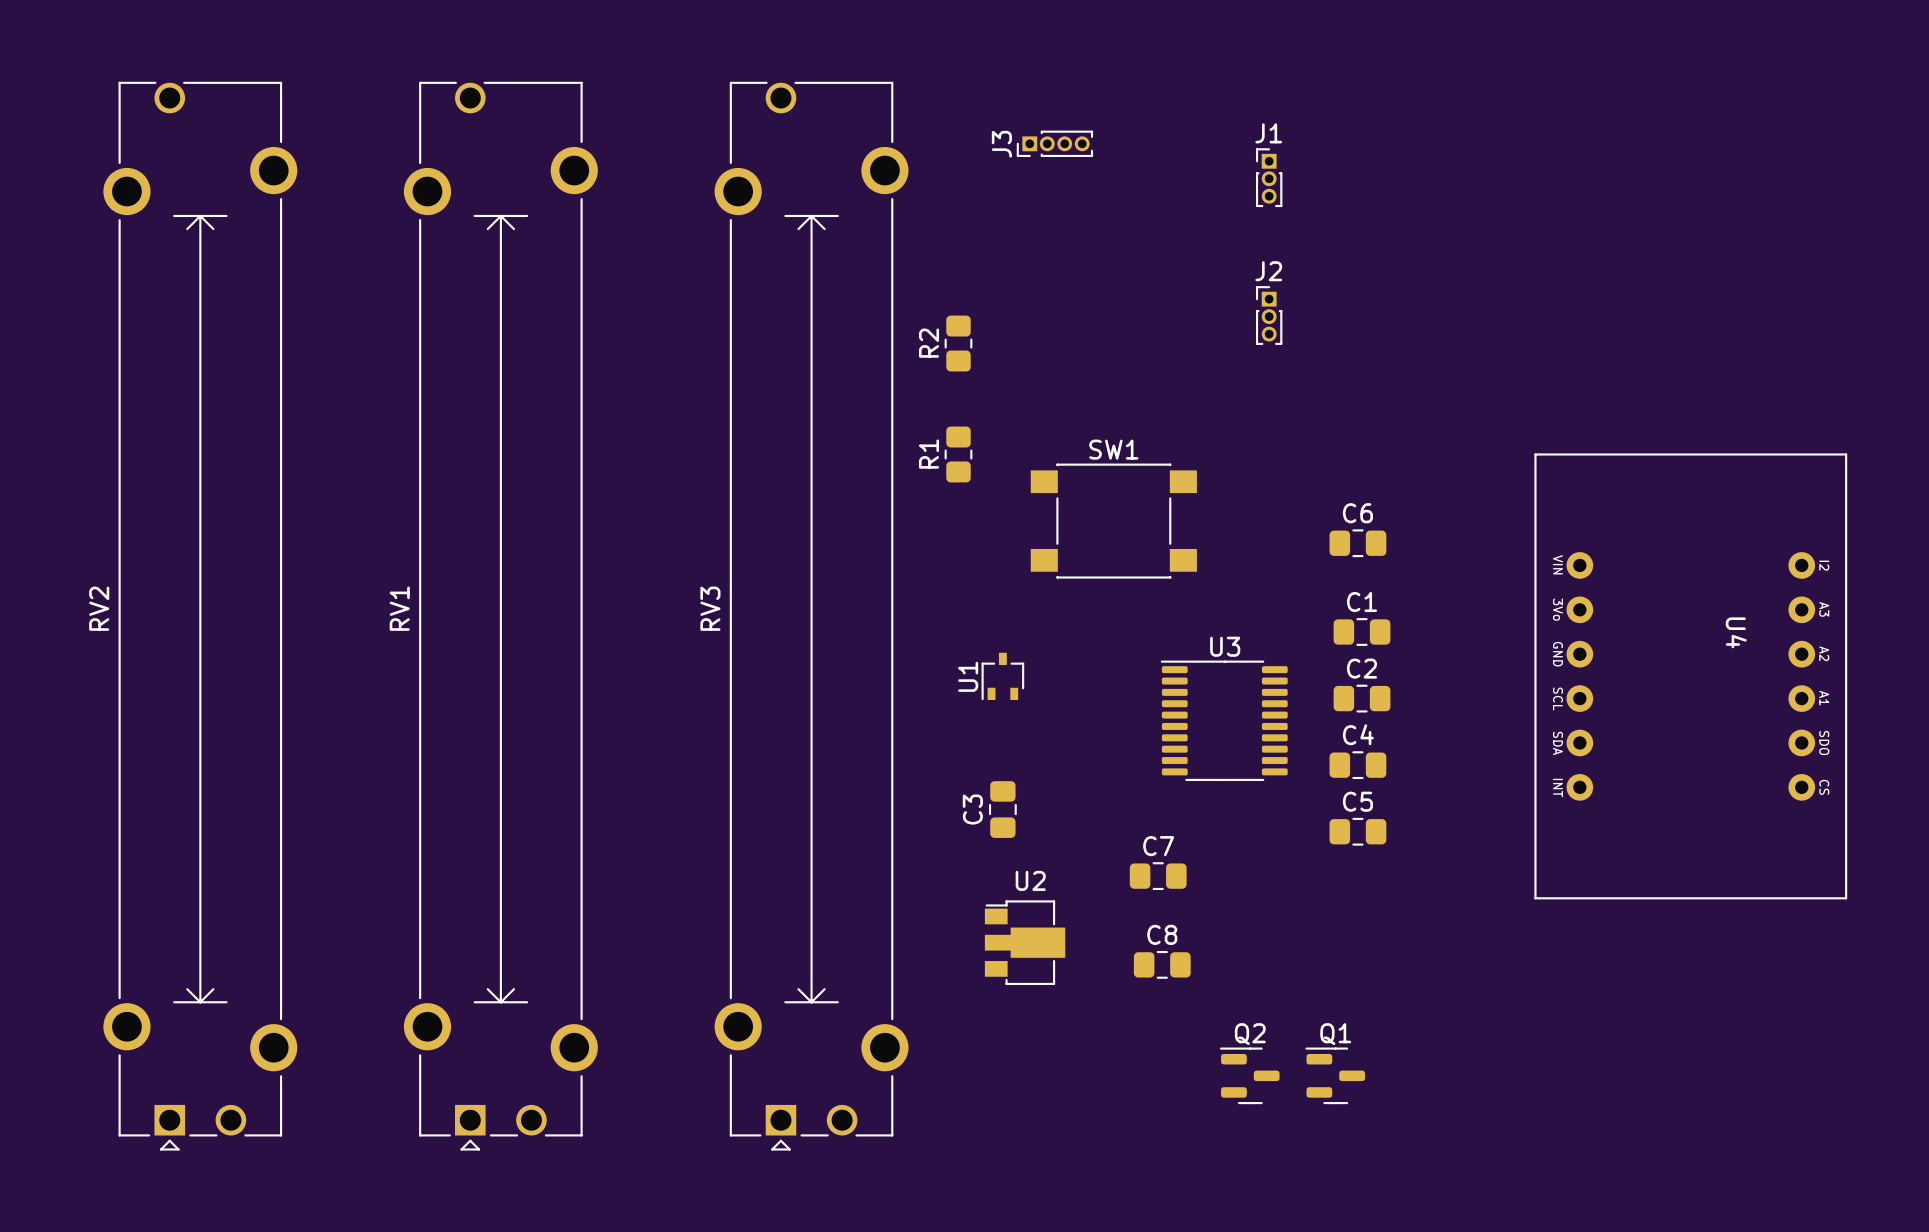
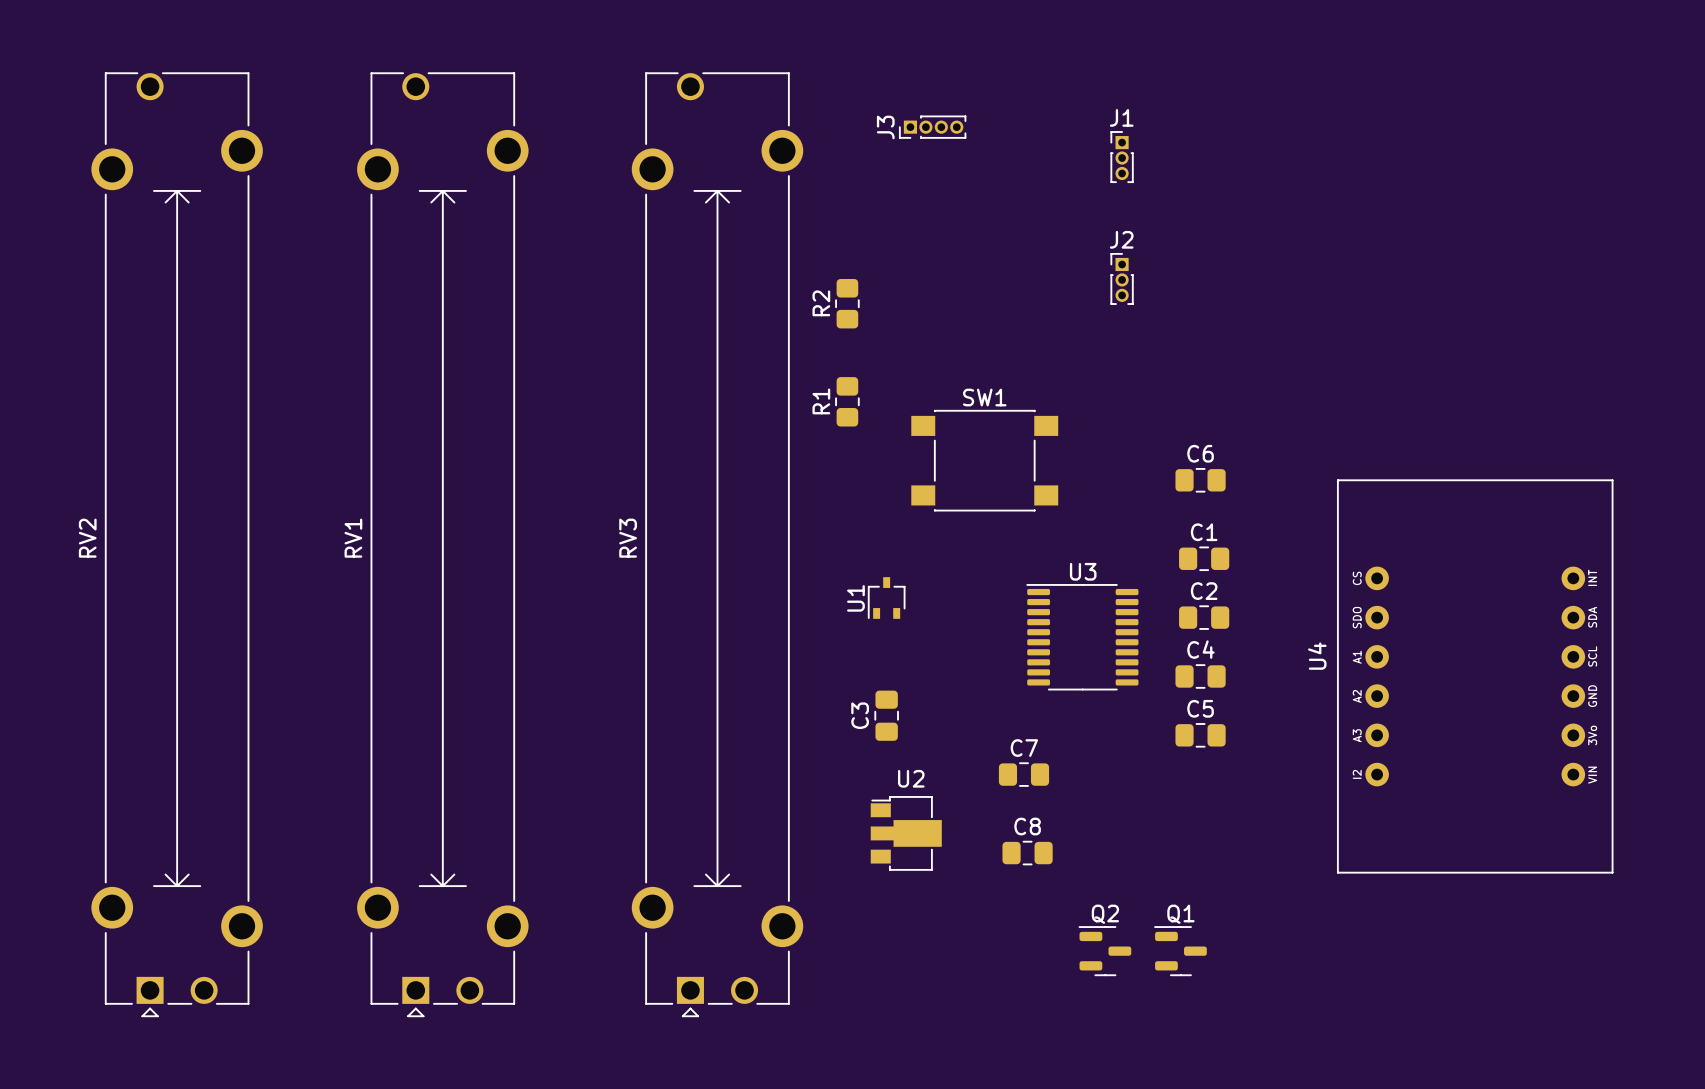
U4 name position: U4 (1736, 632) -> U4 (1317, 656)
U4 rotation: 0° (1690, 676) -> 180° (1475, 676)

